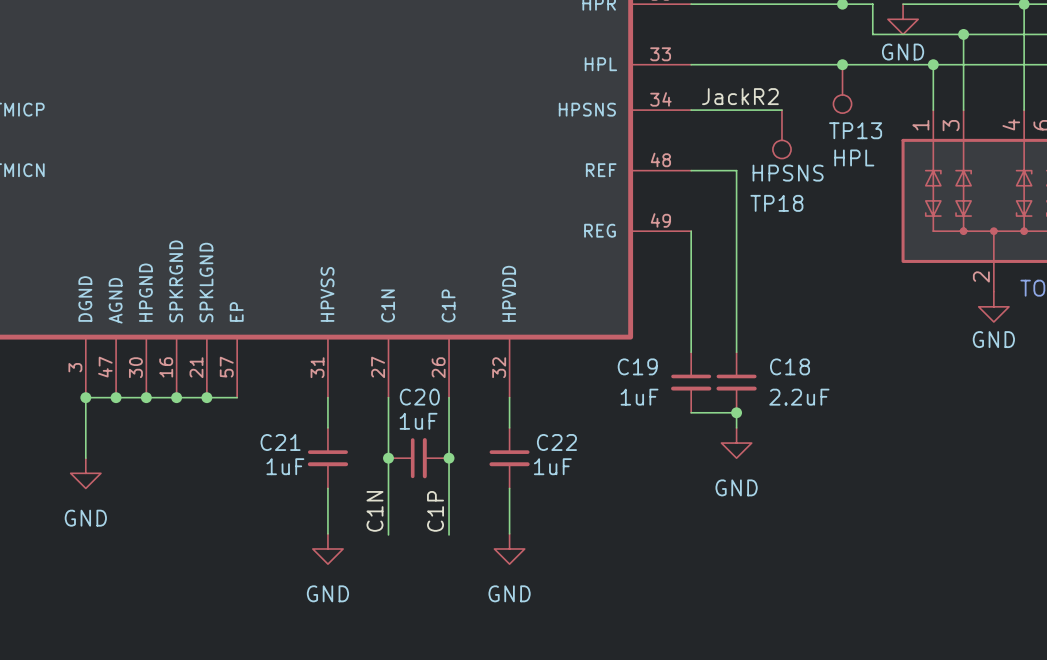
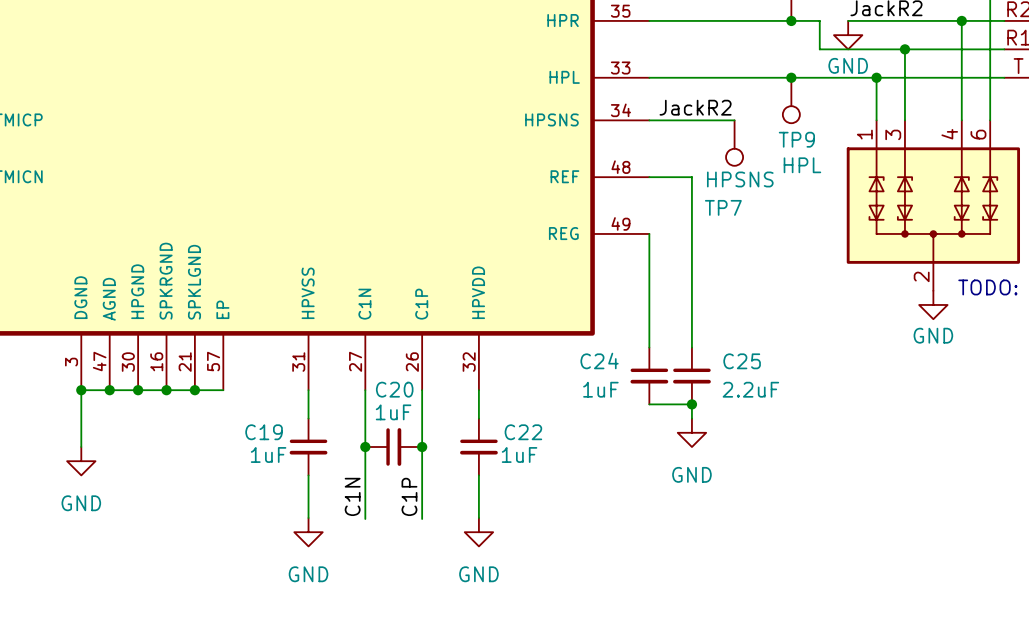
TP13 name: TP13 (855, 130) -> TP9 (796, 139)
TP18 name: TP18 (776, 203) -> TP7 (723, 207)
C19 name: C19 (637, 366) -> C24 (599, 360)
C18 name: C18 (790, 366) -> C25 (742, 361)
C21 name: C21 (280, 442) -> C19 (264, 432)

